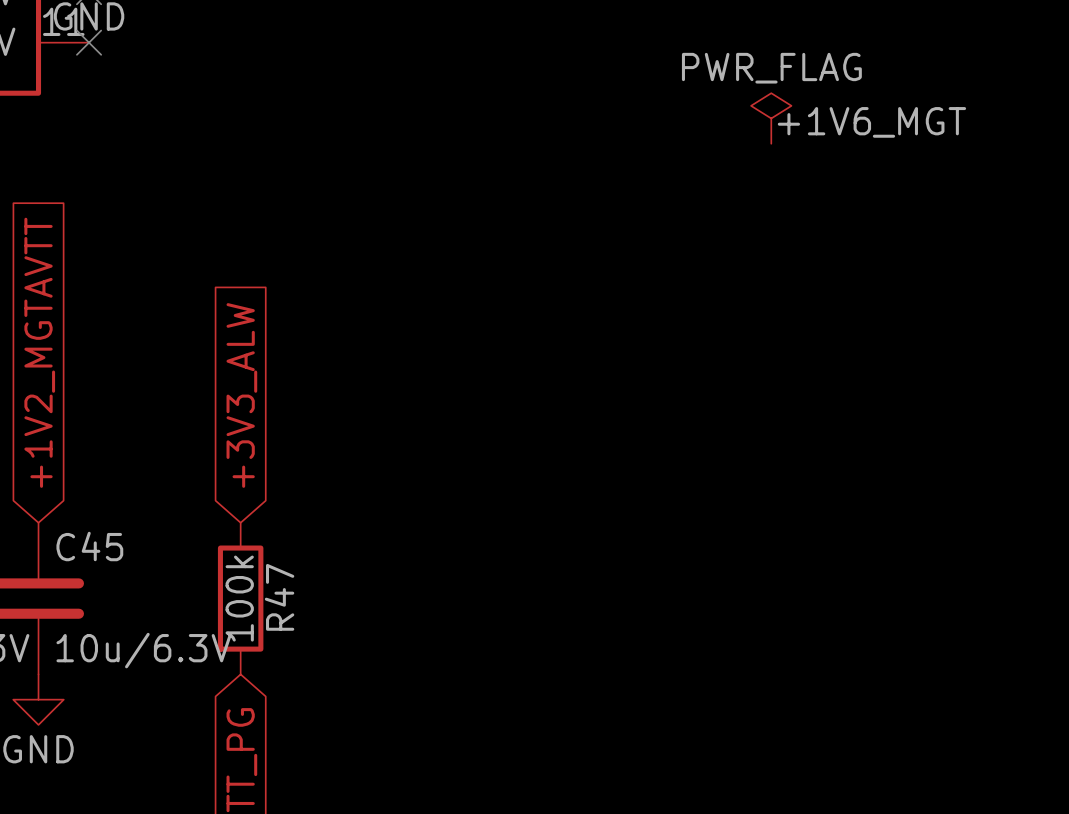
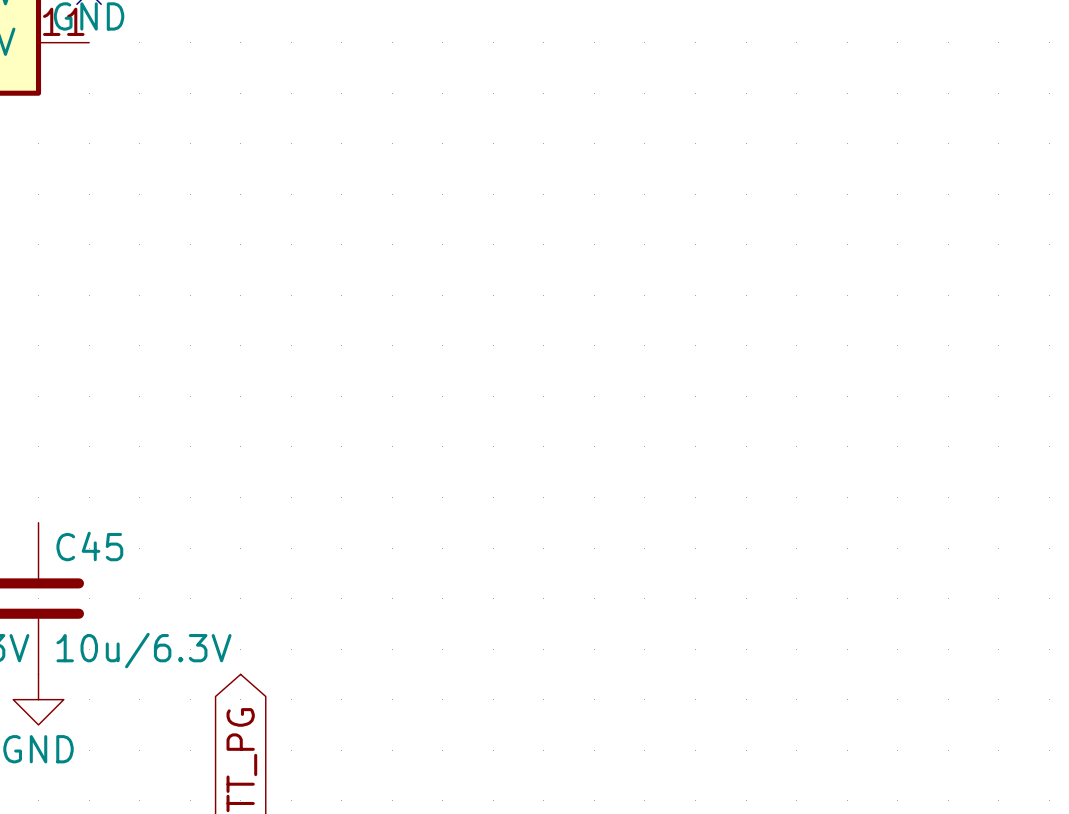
no-connect mark: (89, 42) -> none
power symbol: PWR_FLAG (771, 118) -> none
label: +1V6_MGT (871, 122) -> none
global label: +1V2_MGTAVTT (39, 352) -> none
global label: +3V3_ALW (241, 395) -> none
R47: 100k (240, 598) -> none

